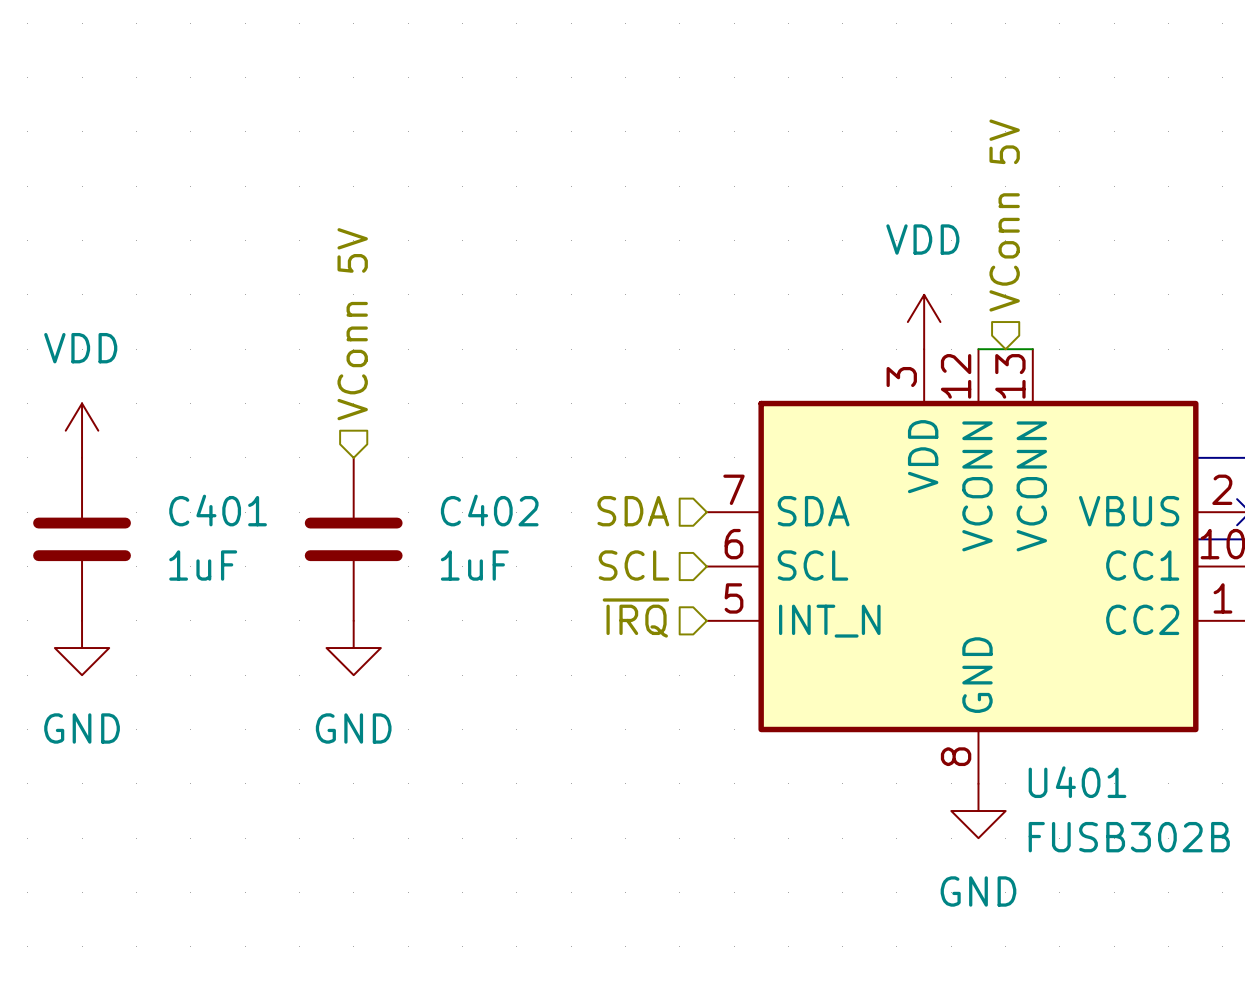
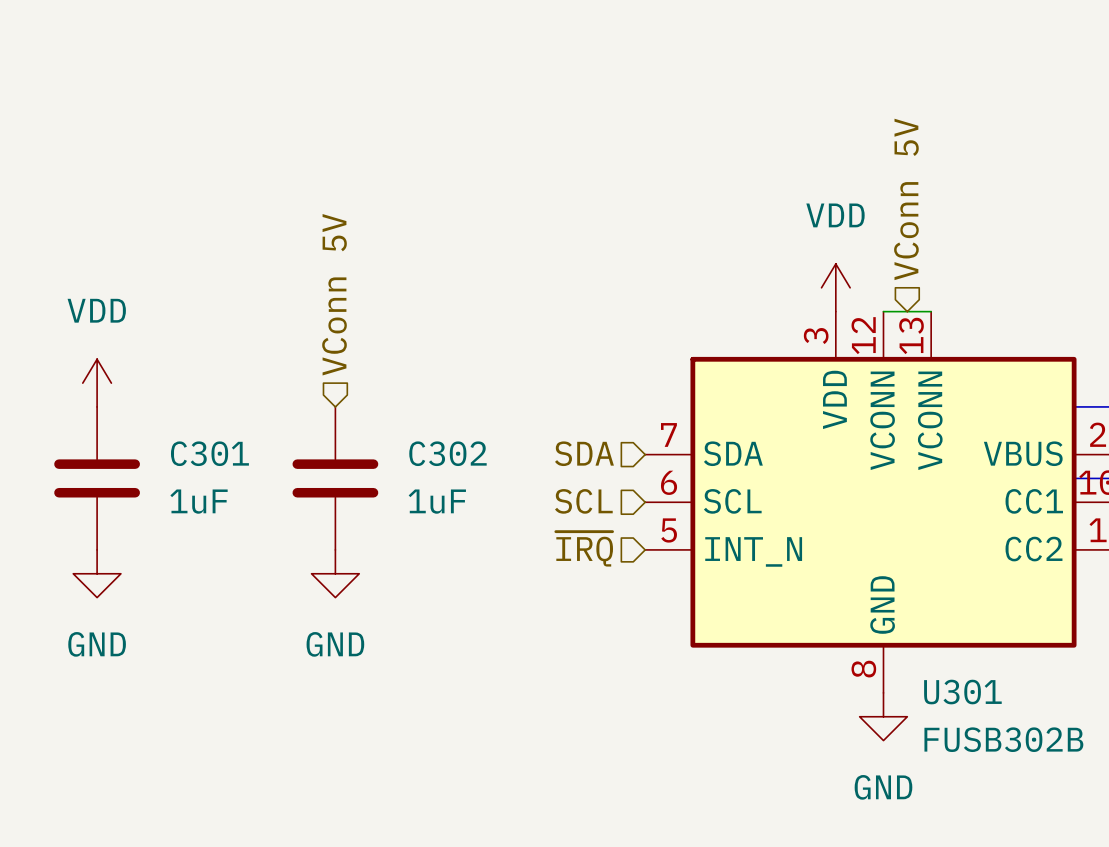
C401 name: C401 (218, 510) -> C301 (209, 453)
C402 name: C402 (489, 510) -> C302 (447, 453)
U401 name: U401 (1077, 782) -> U301 (962, 692)

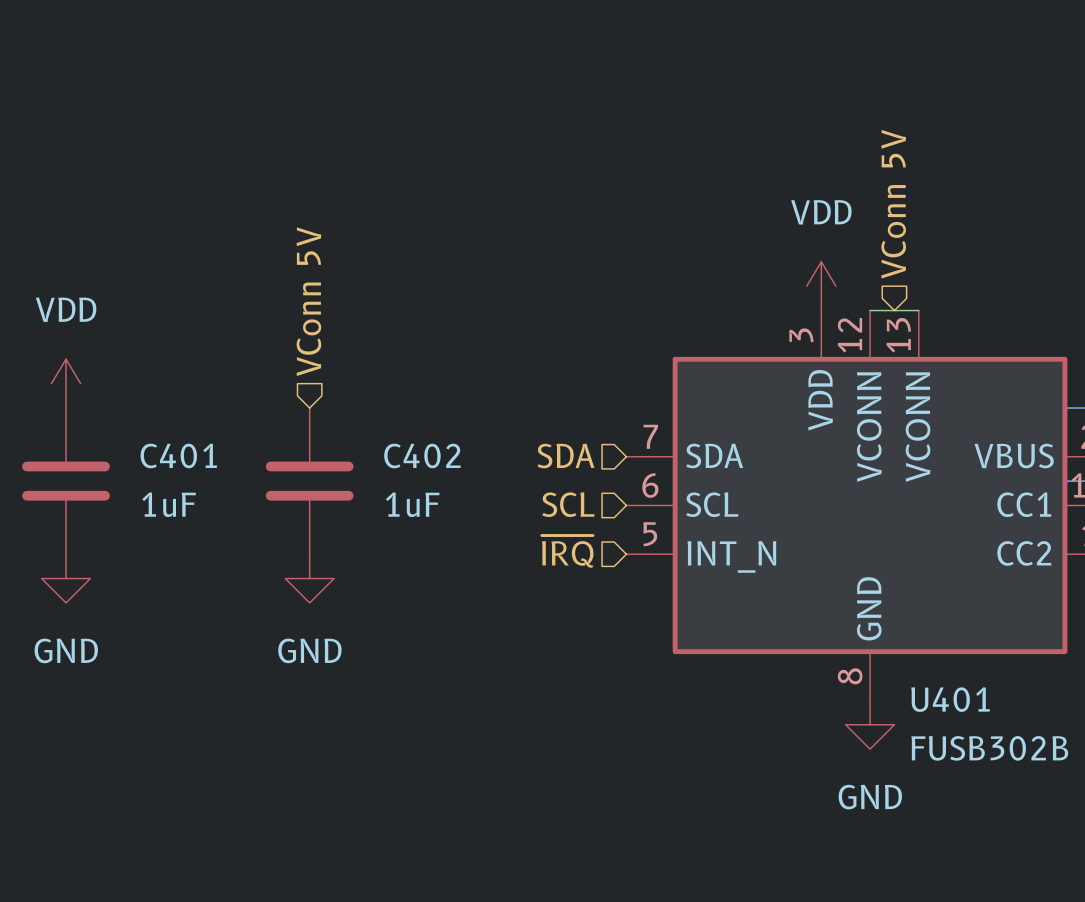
C301 name: C301 (209, 453) -> C401 (178, 455)
C302 name: C302 (447, 453) -> C402 (422, 455)
U301 name: U301 (962, 692) -> U401 (950, 699)

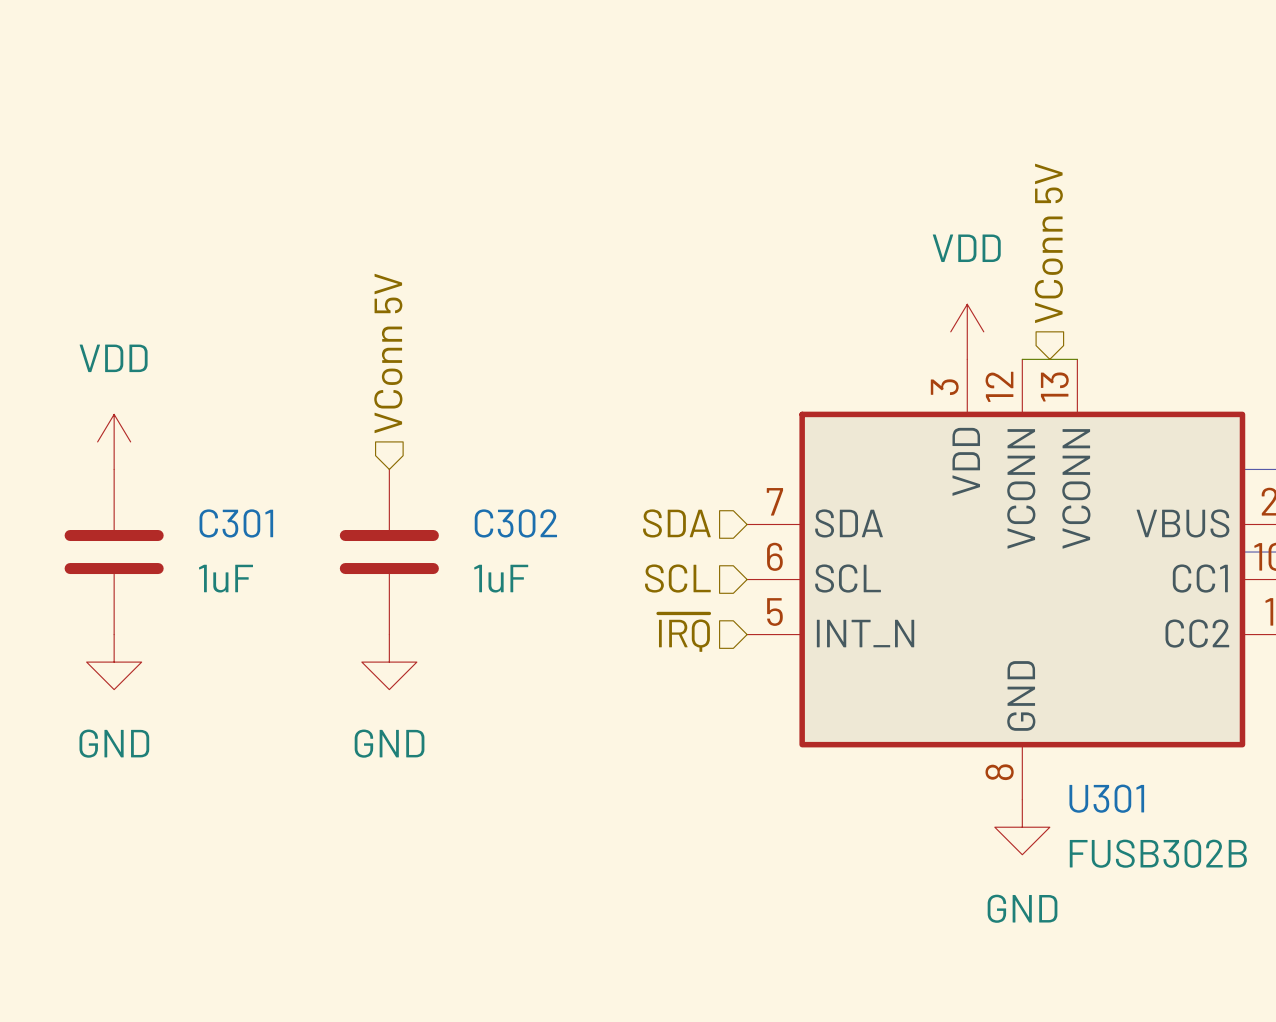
C401 name: C401 (178, 455) -> C301 (236, 523)
C402 name: C402 (422, 455) -> C302 (515, 523)
U401 name: U401 (950, 699) -> U301 (1106, 798)

